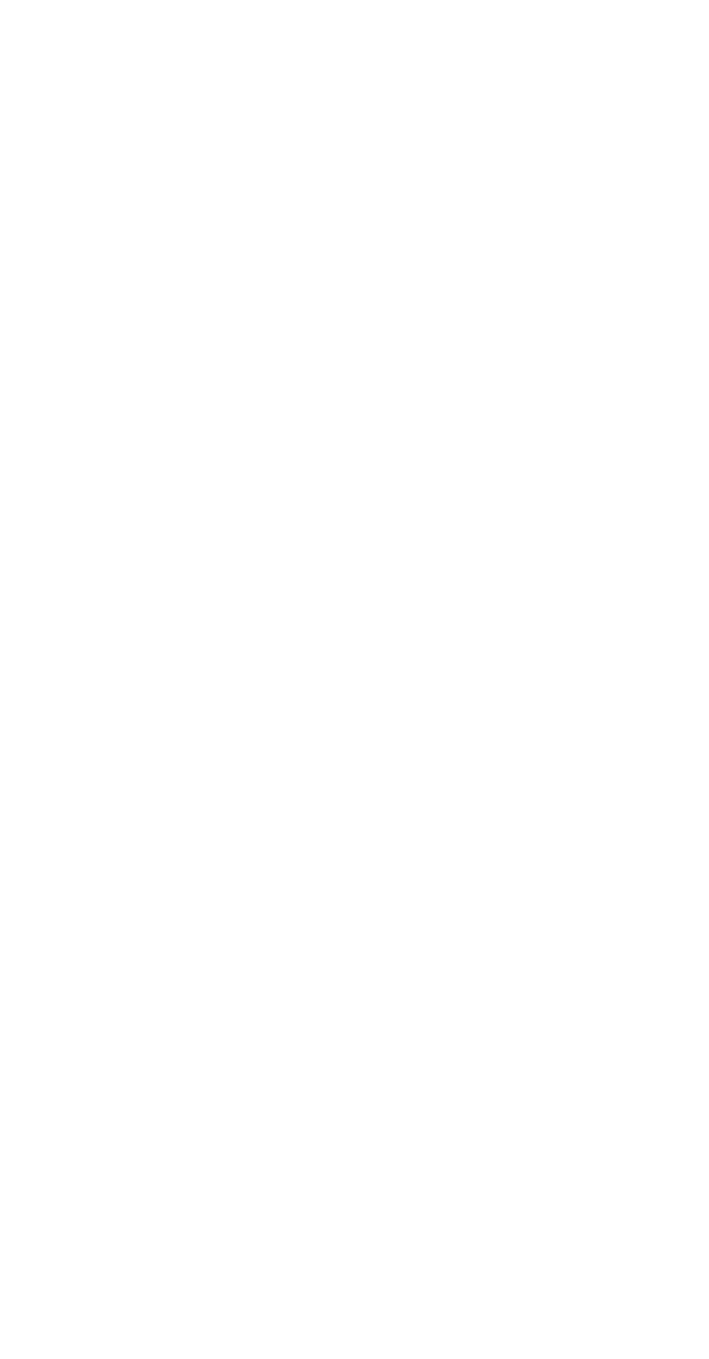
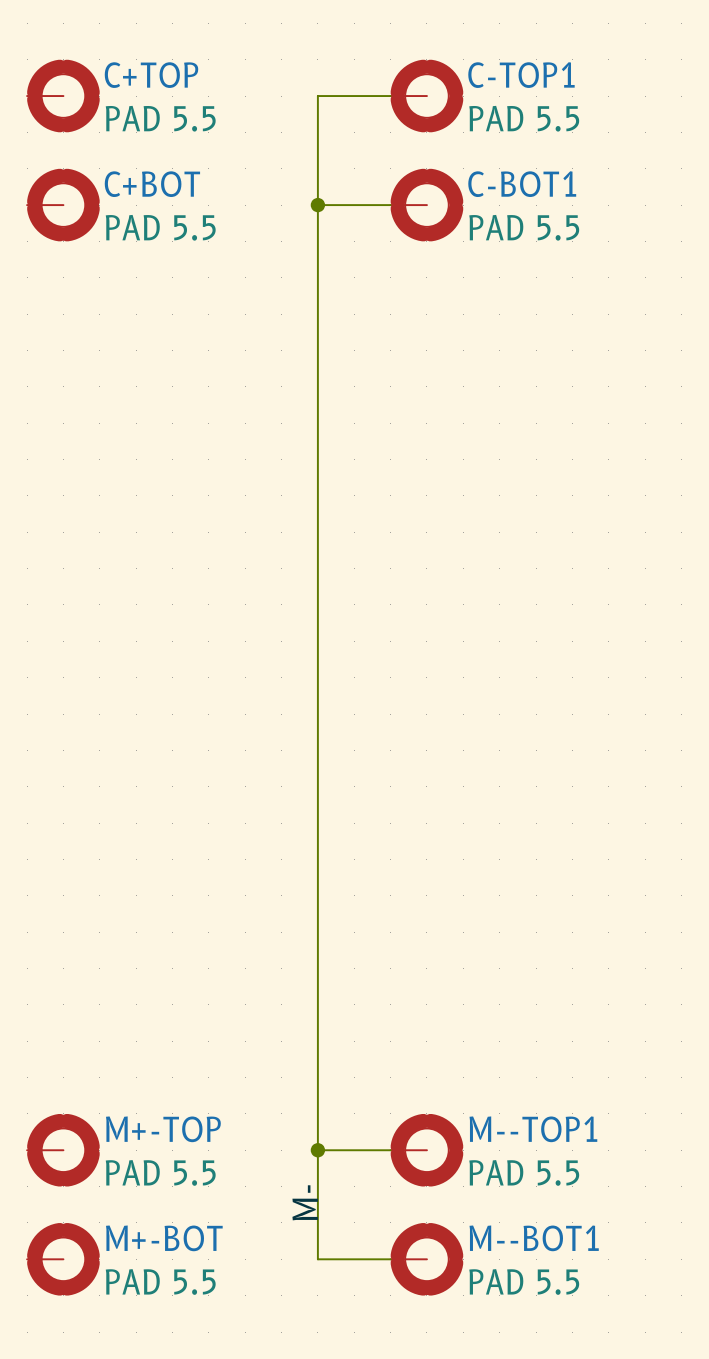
C+TOP: none -> PAD 5.5 (63, 96)
wire: none -> (390, 96) (317, 96) (317, 1259) (390, 1259)
C-TOP1: none -> PAD 5.5 (426, 96)
C+BOT: none -> PAD 5.5 (63, 205)
wire: none -> (317, 205) (390, 205)
junction: none -> (317, 205)
C-BOT1: none -> PAD 5.5 (426, 205)
M+-TOP: none -> PAD 5.5 (63, 1150)
wire: none -> (317, 1150) (390, 1150)
junction: none -> (317, 1150)
M--TOP1: none -> PAD 5.5 (426, 1150)
label: none -> M- (305, 1202)
M+-BOT: none -> PAD 5.5 (63, 1259)
M--BOT1: none -> PAD 5.5 (426, 1259)

